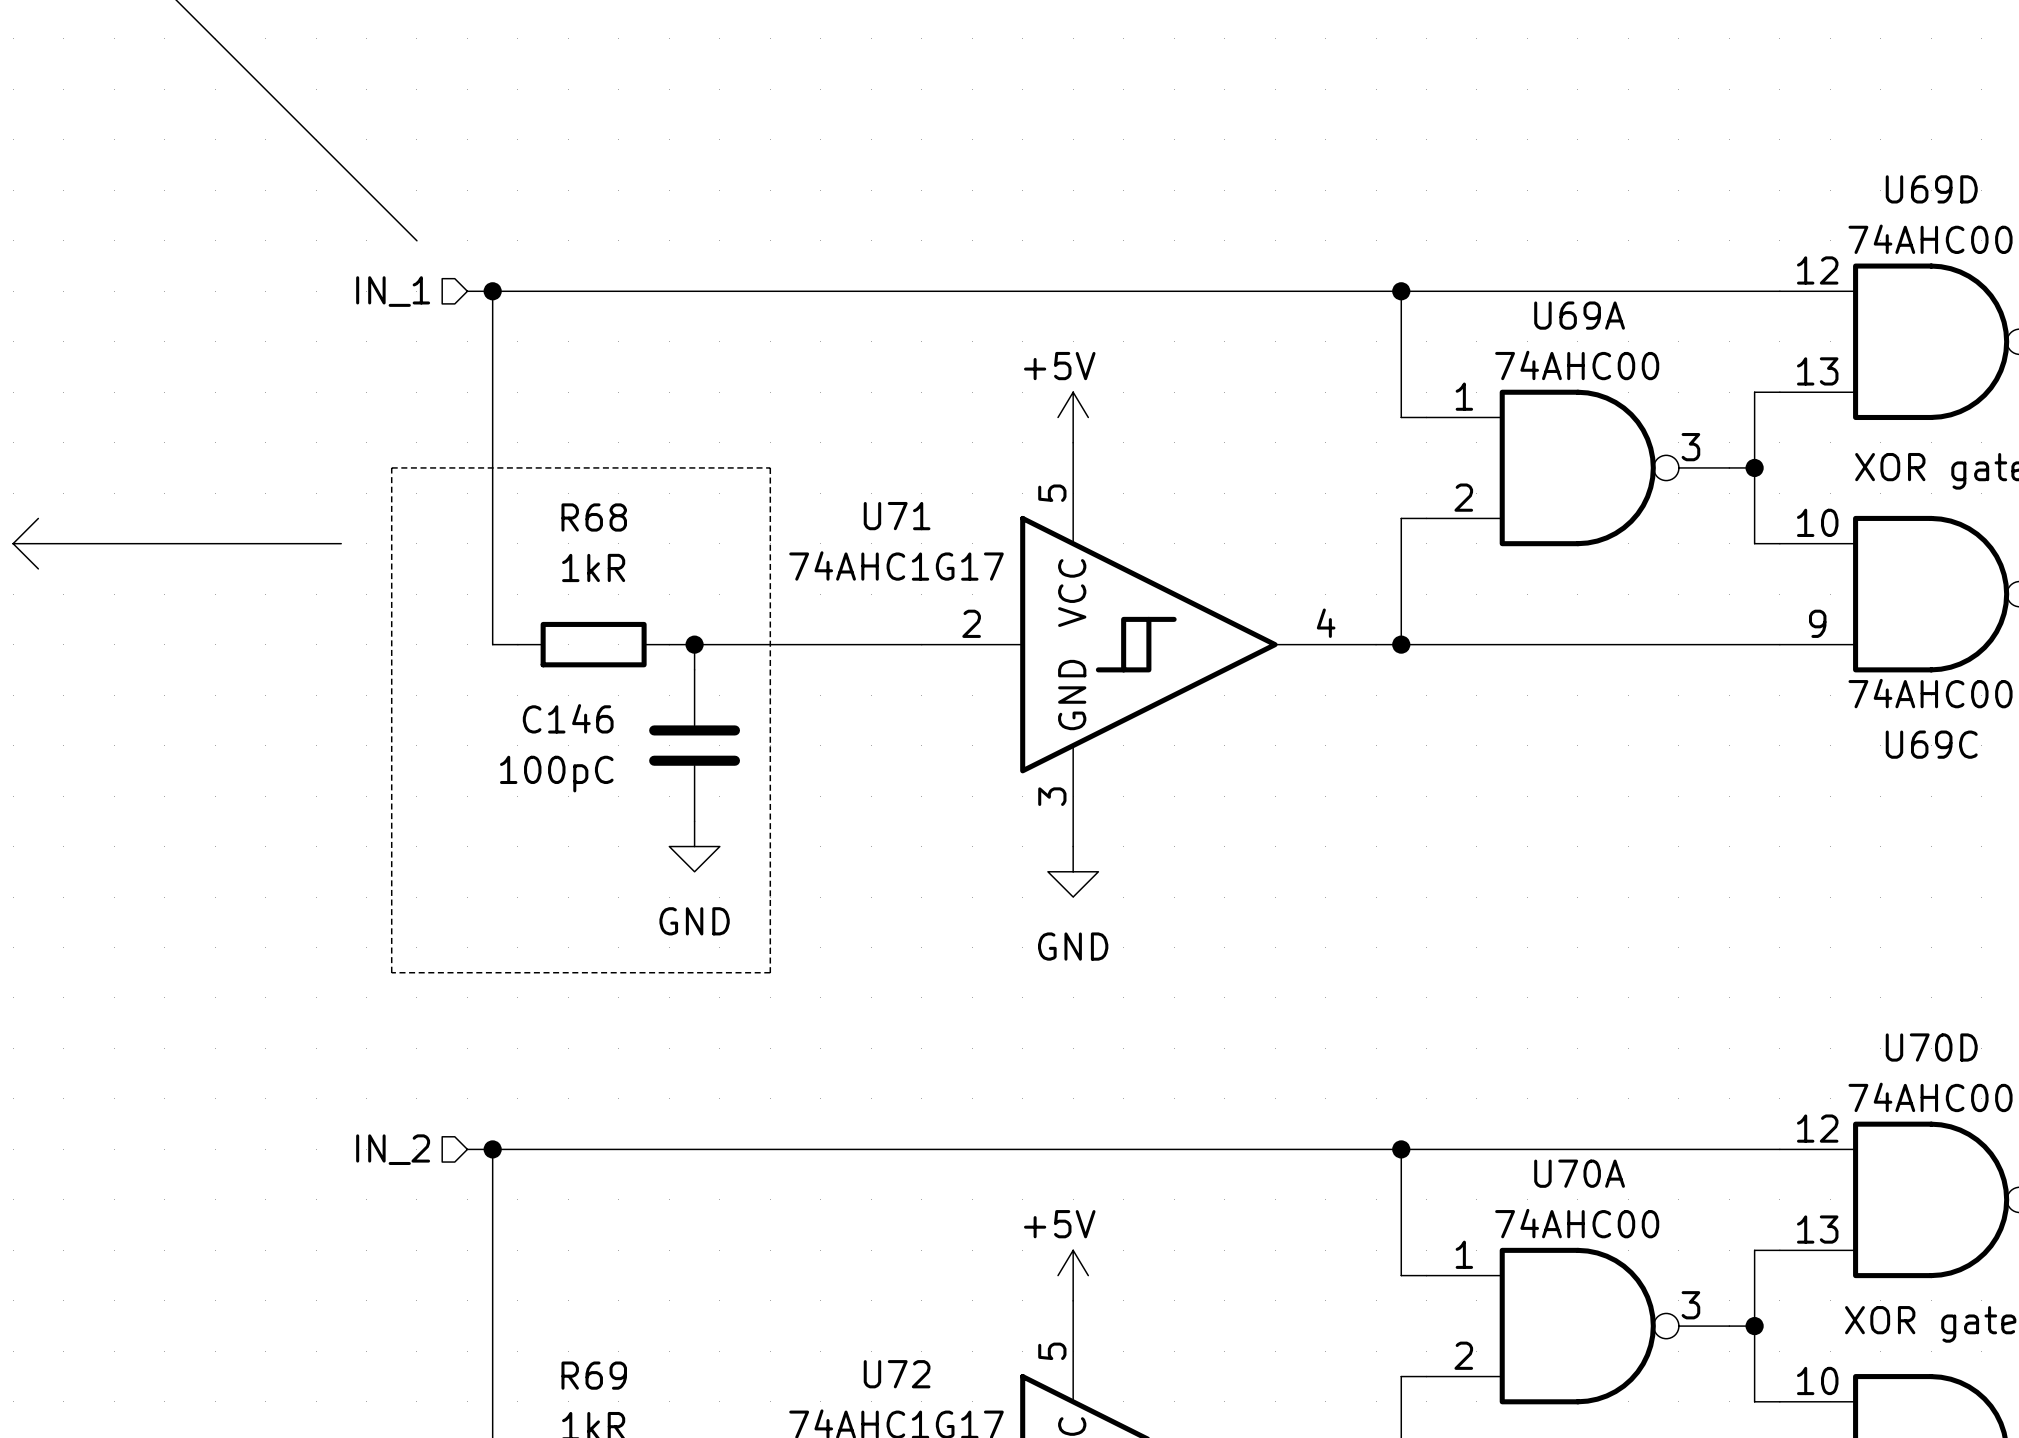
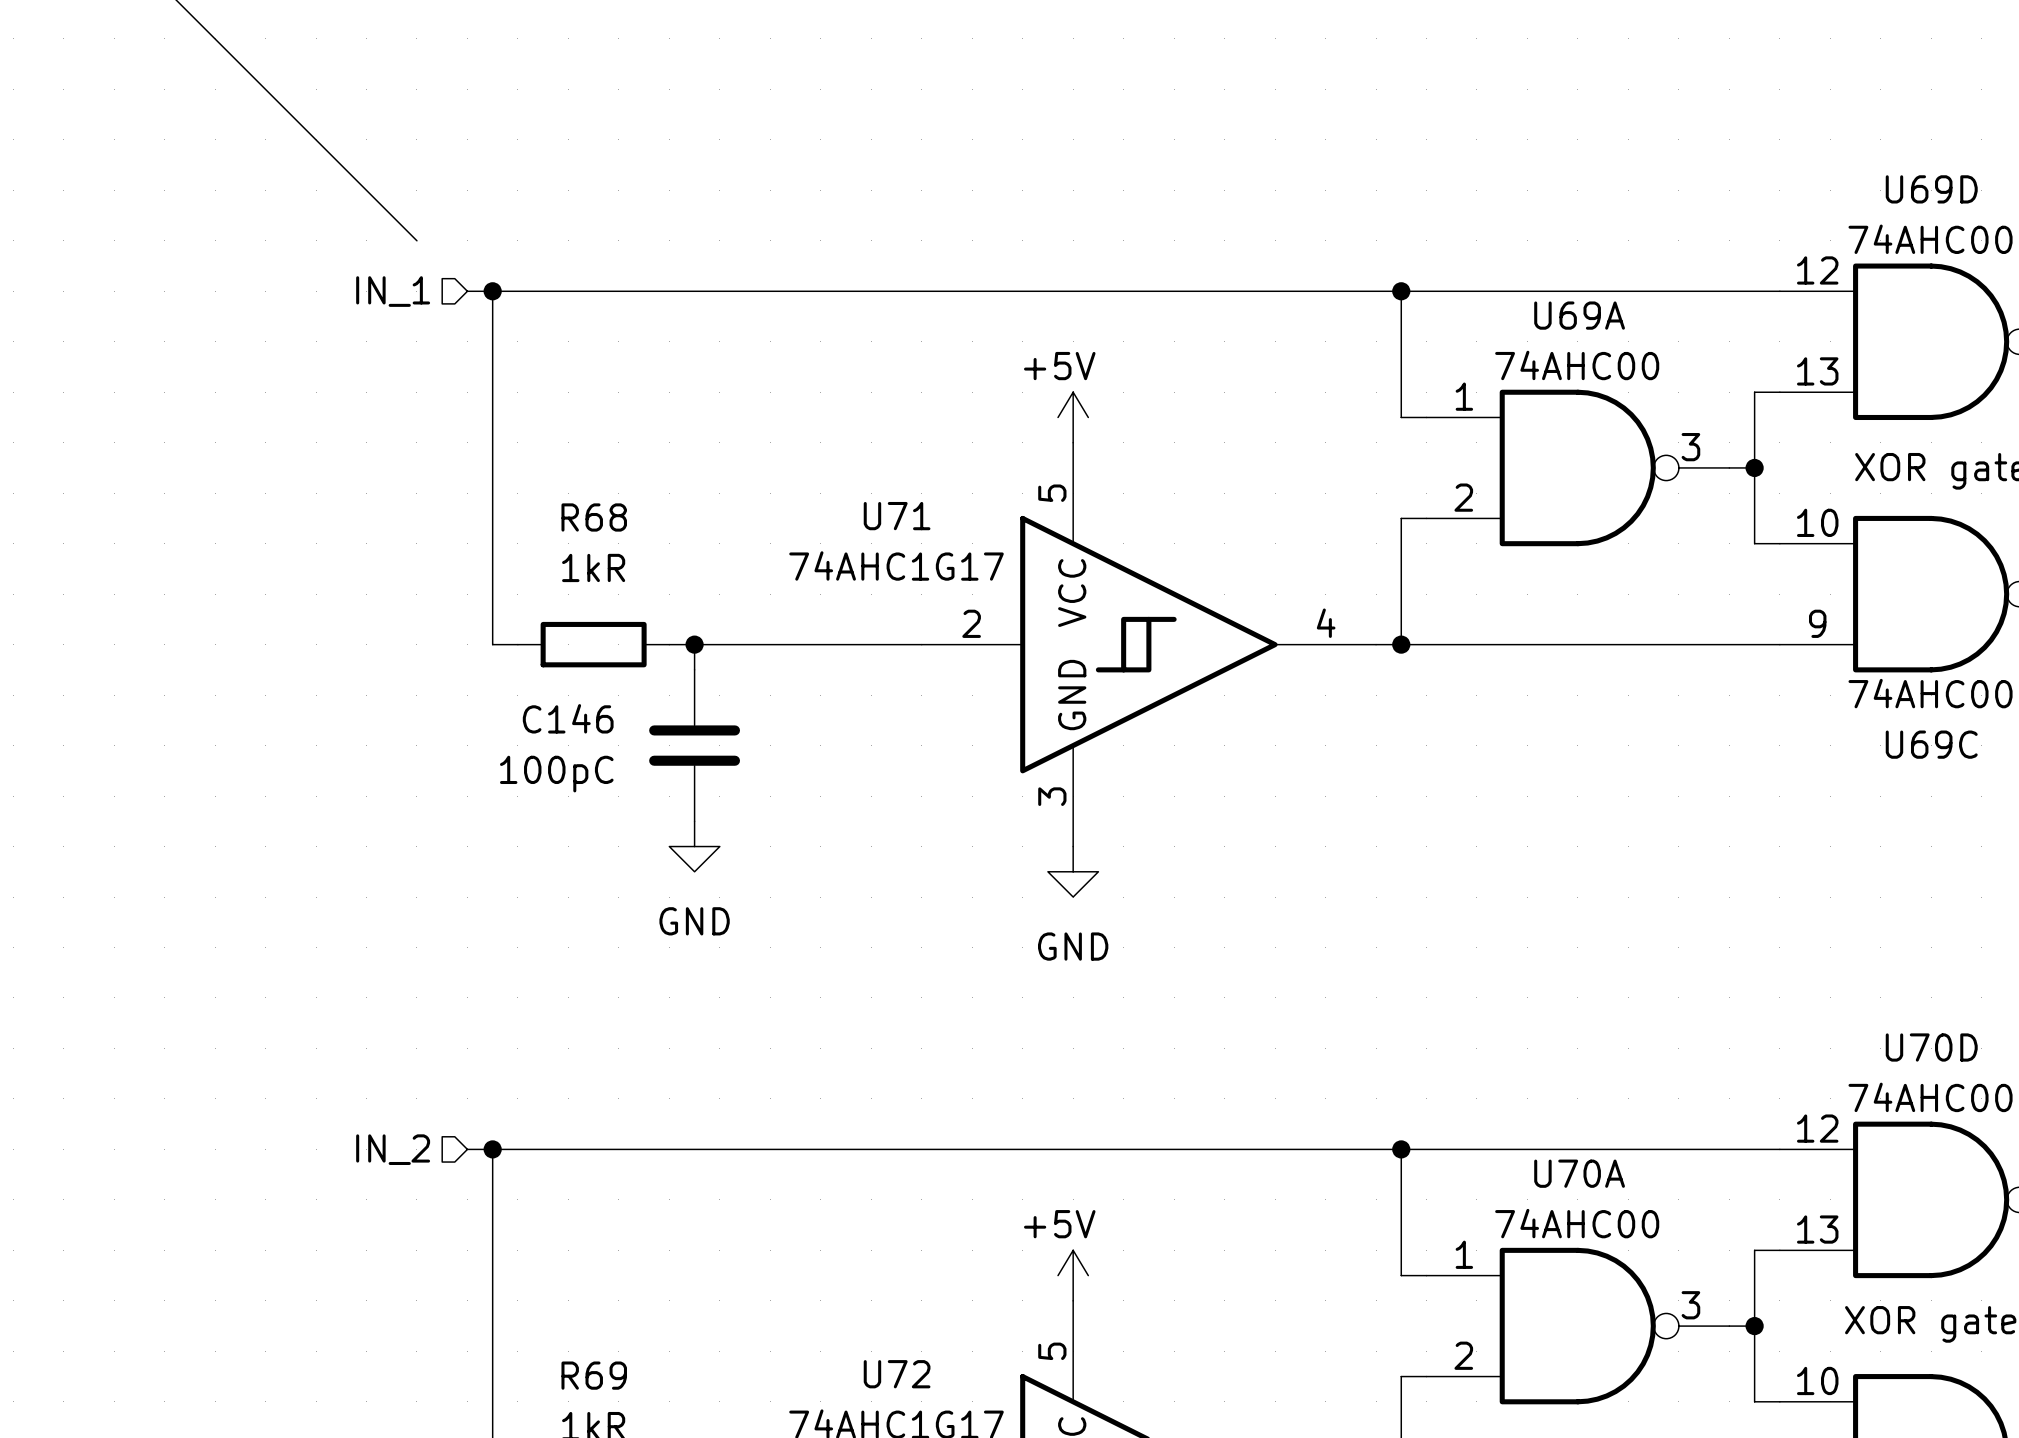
line: (391, 467) (770, 467) (770, 972) (391, 972) (391, 467) -> none
line: (38, 518) (13, 543) -> none
line: (13, 543) (38, 568) -> none
line: (13, 543) (341, 543) -> none

